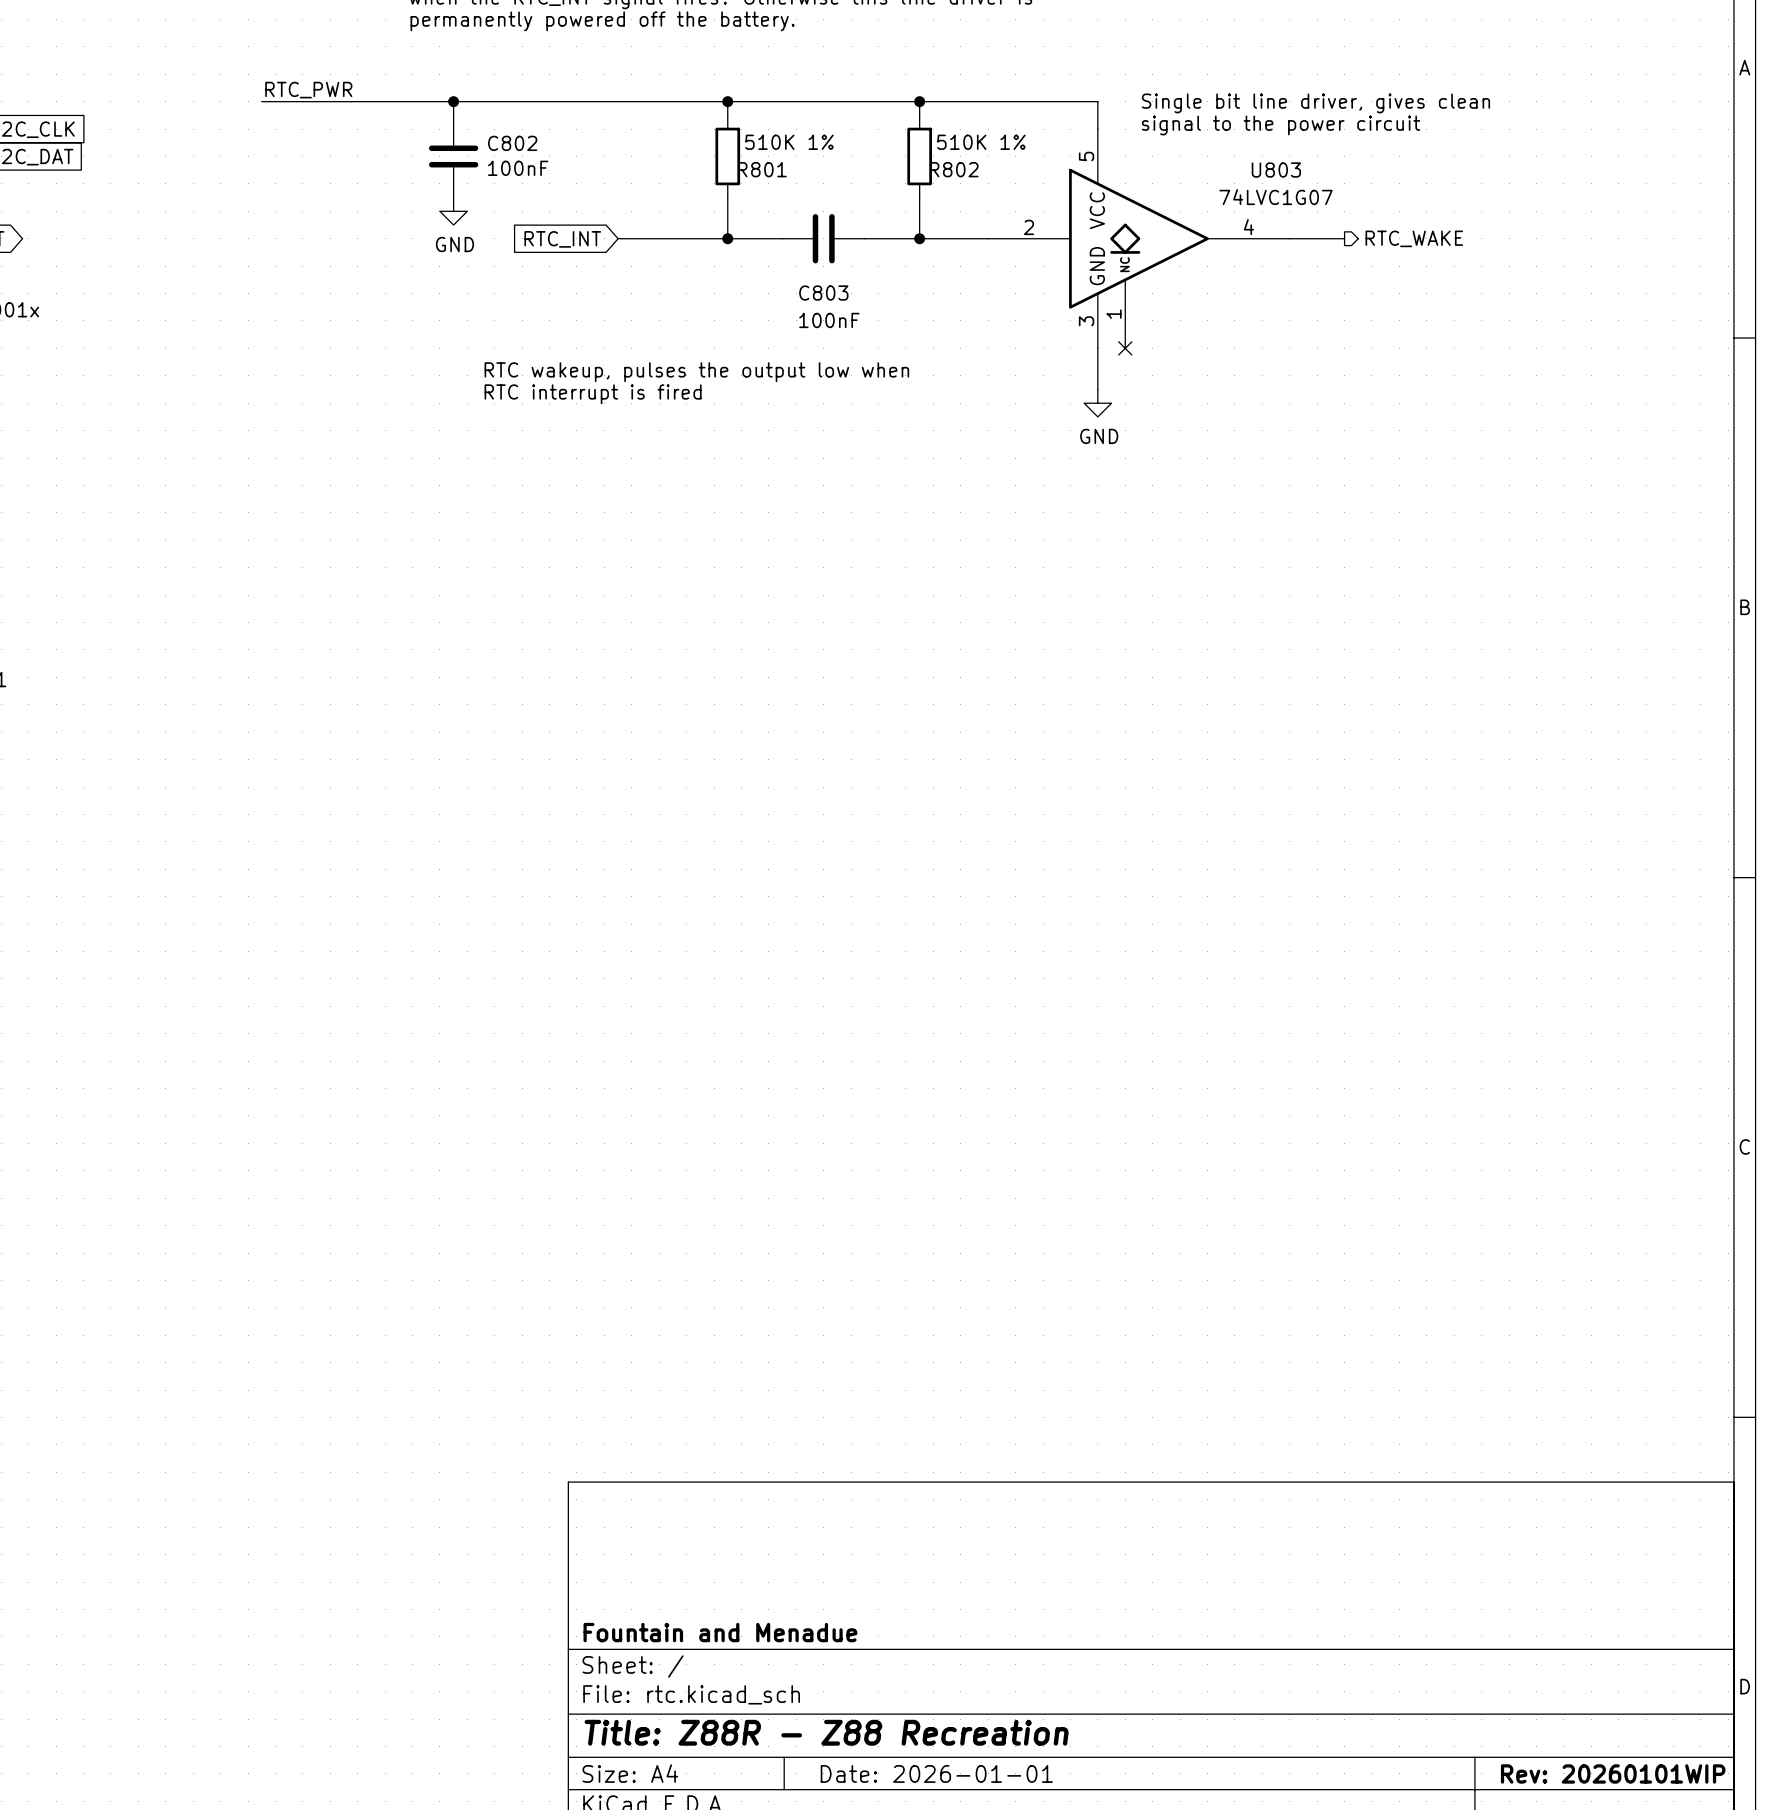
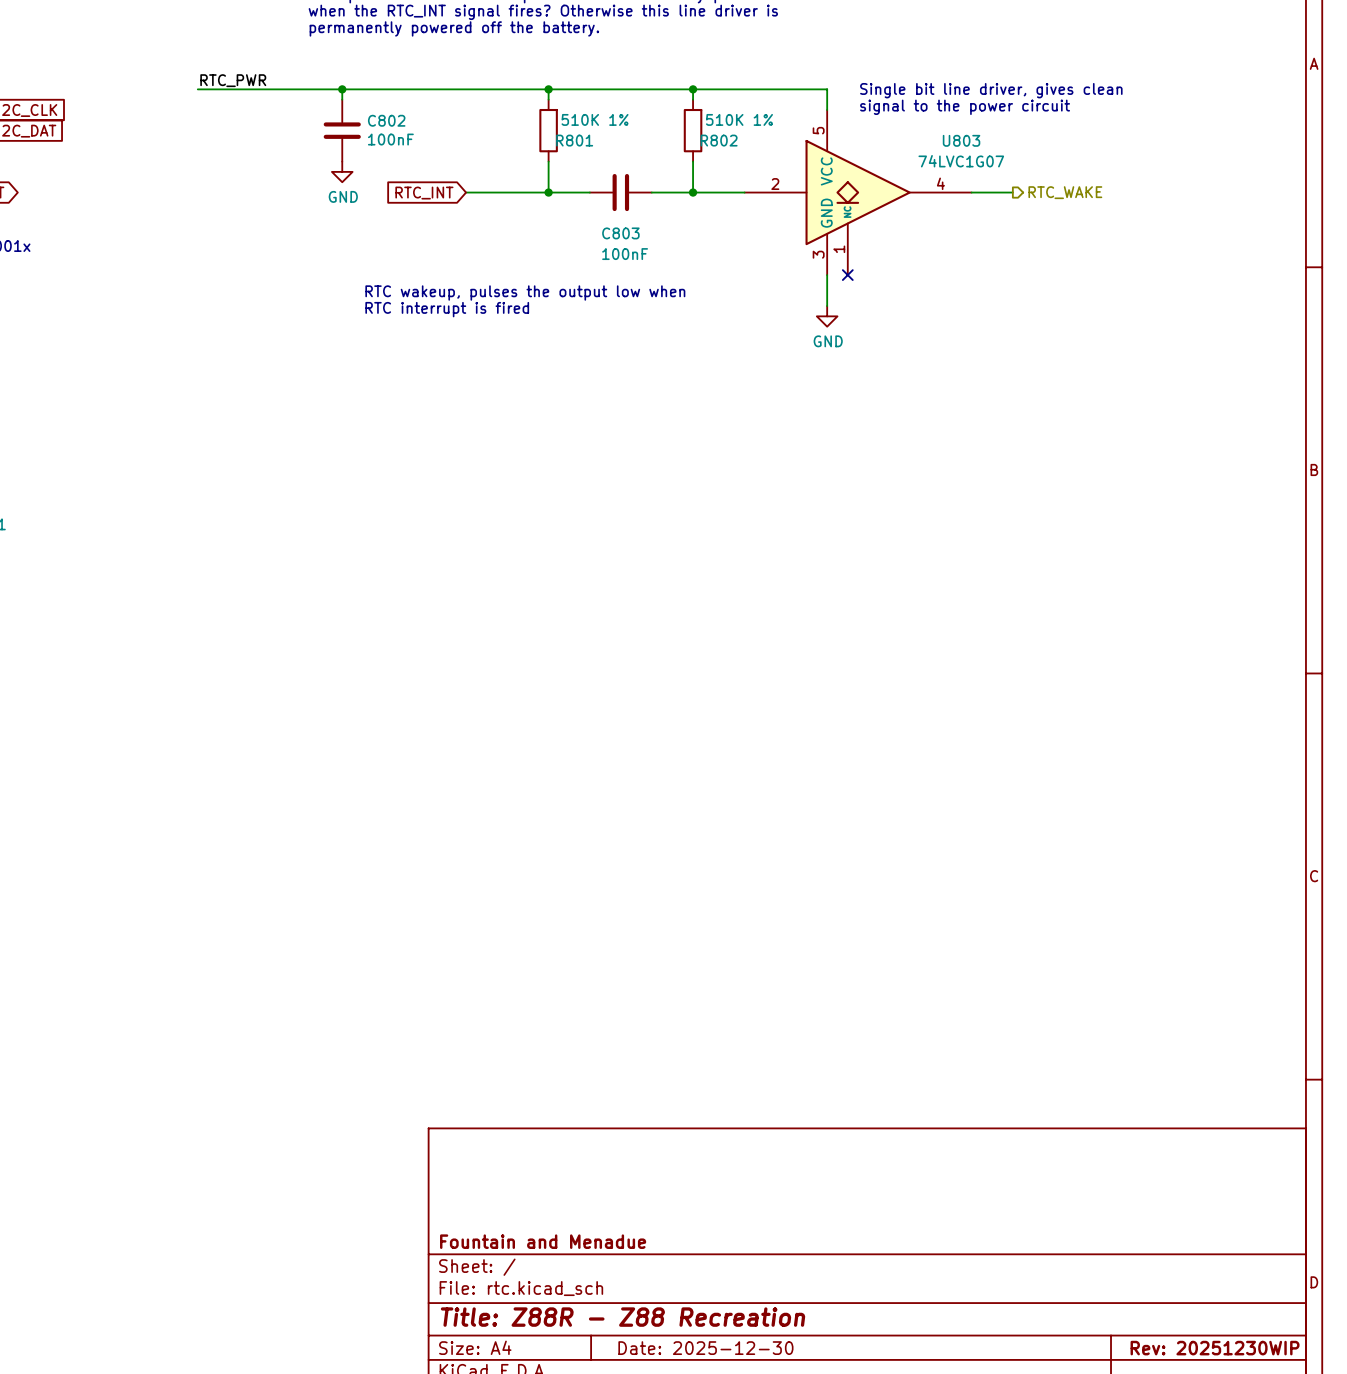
title block: Date: 2026-01-01 (936, 1773) -> Date: 2025-12-30 (705, 1348)
title block: Rev: 20260101WIP (1613, 1773) -> Rev: 20251230WIP (1215, 1348)

